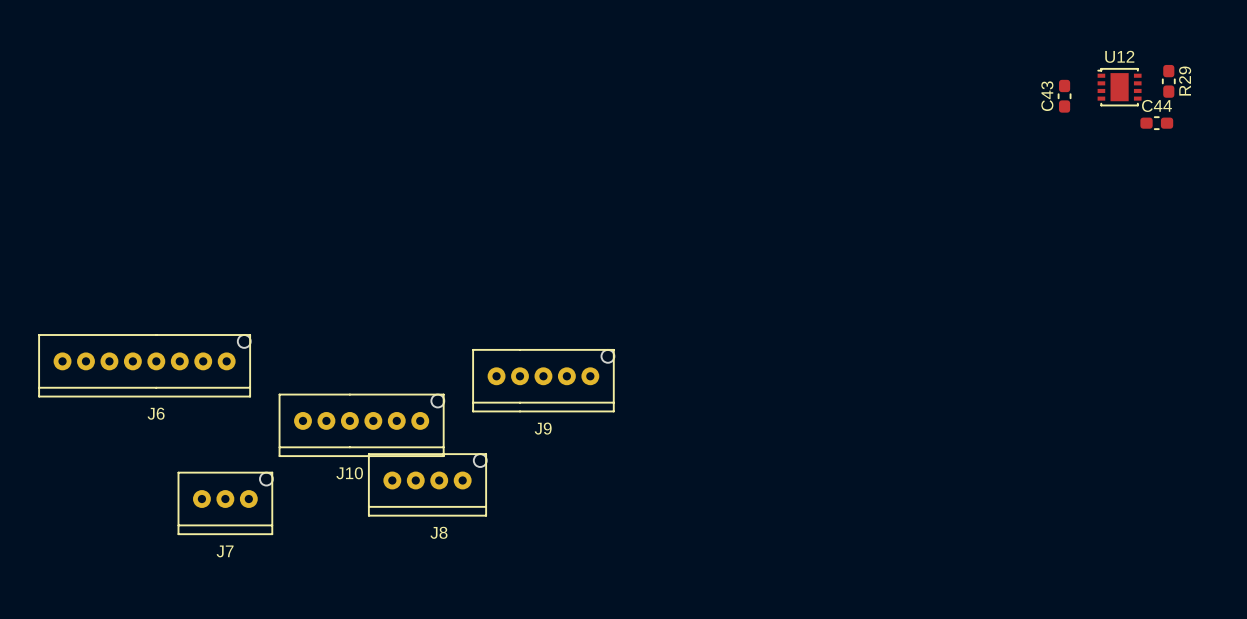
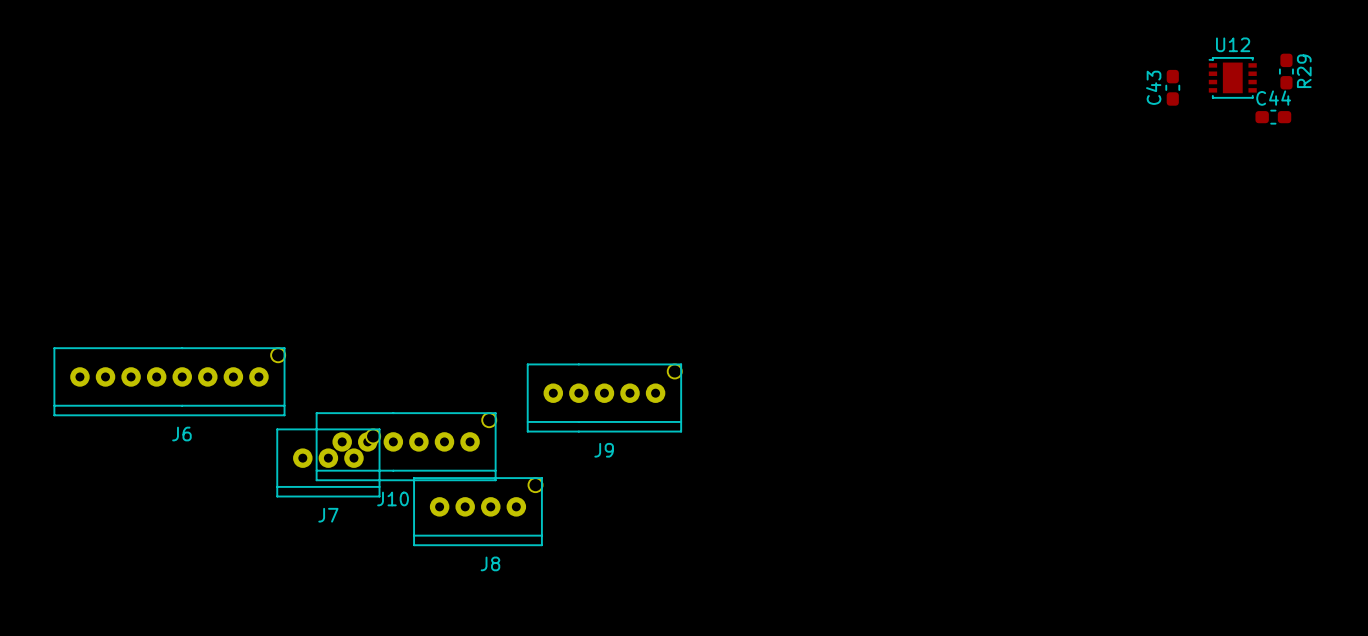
J7 position: (225, 503) -> (328, 462)

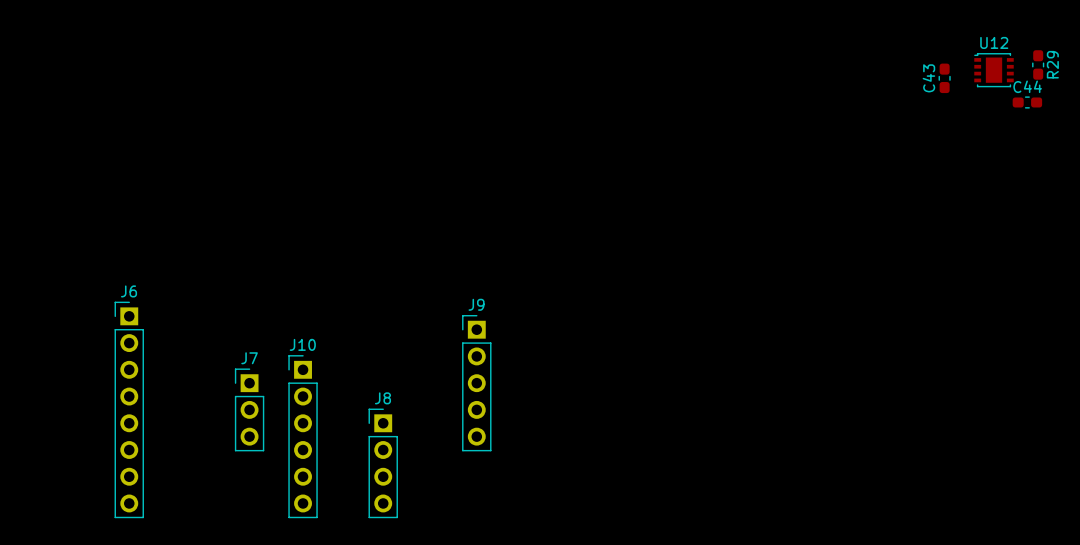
J6 footprint: [53, 347, 286, 417] -> [114, 301, 144, 519]
J9 footprint: [526, 363, 683, 433] -> [462, 315, 492, 452]
J10 footprint: [315, 412, 497, 482] -> [288, 355, 318, 519]
J7 footprint: [276, 428, 381, 498] -> [234, 368, 265, 452]
J6 name position: J6 (181, 434) -> J6 (129, 291)
J9 name position: J9 (604, 450) -> J9 (476, 304)
J8 footprint: [413, 477, 543, 547] -> [368, 408, 398, 519]
J10 name position: J10 (393, 498) -> J10 (302, 344)
J7 name position: J7 (328, 515) -> J7 (249, 358)
J8 name position: J8 (490, 563) -> J8 (382, 398)

